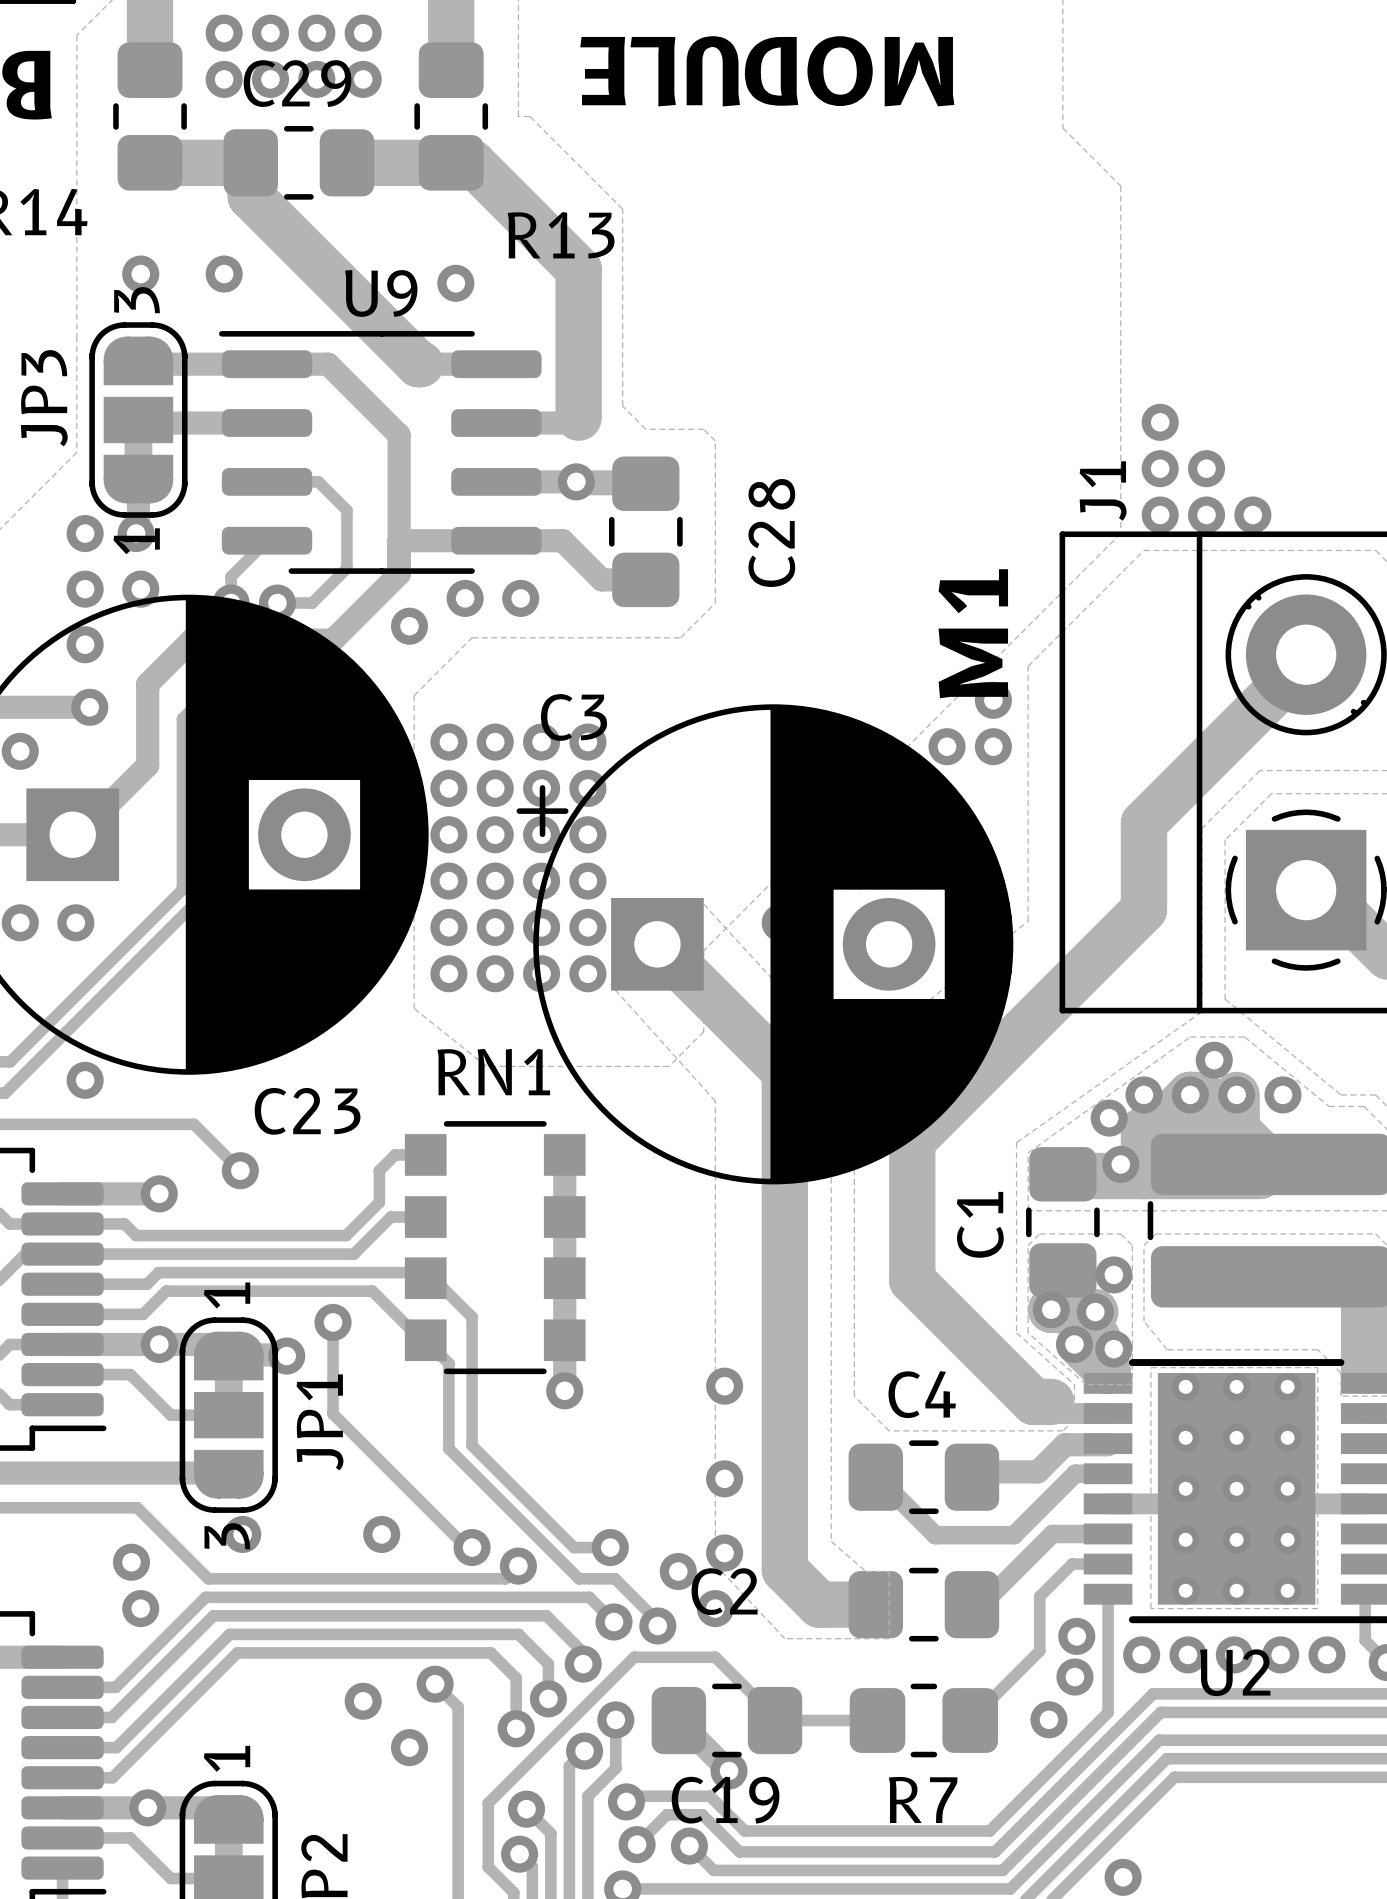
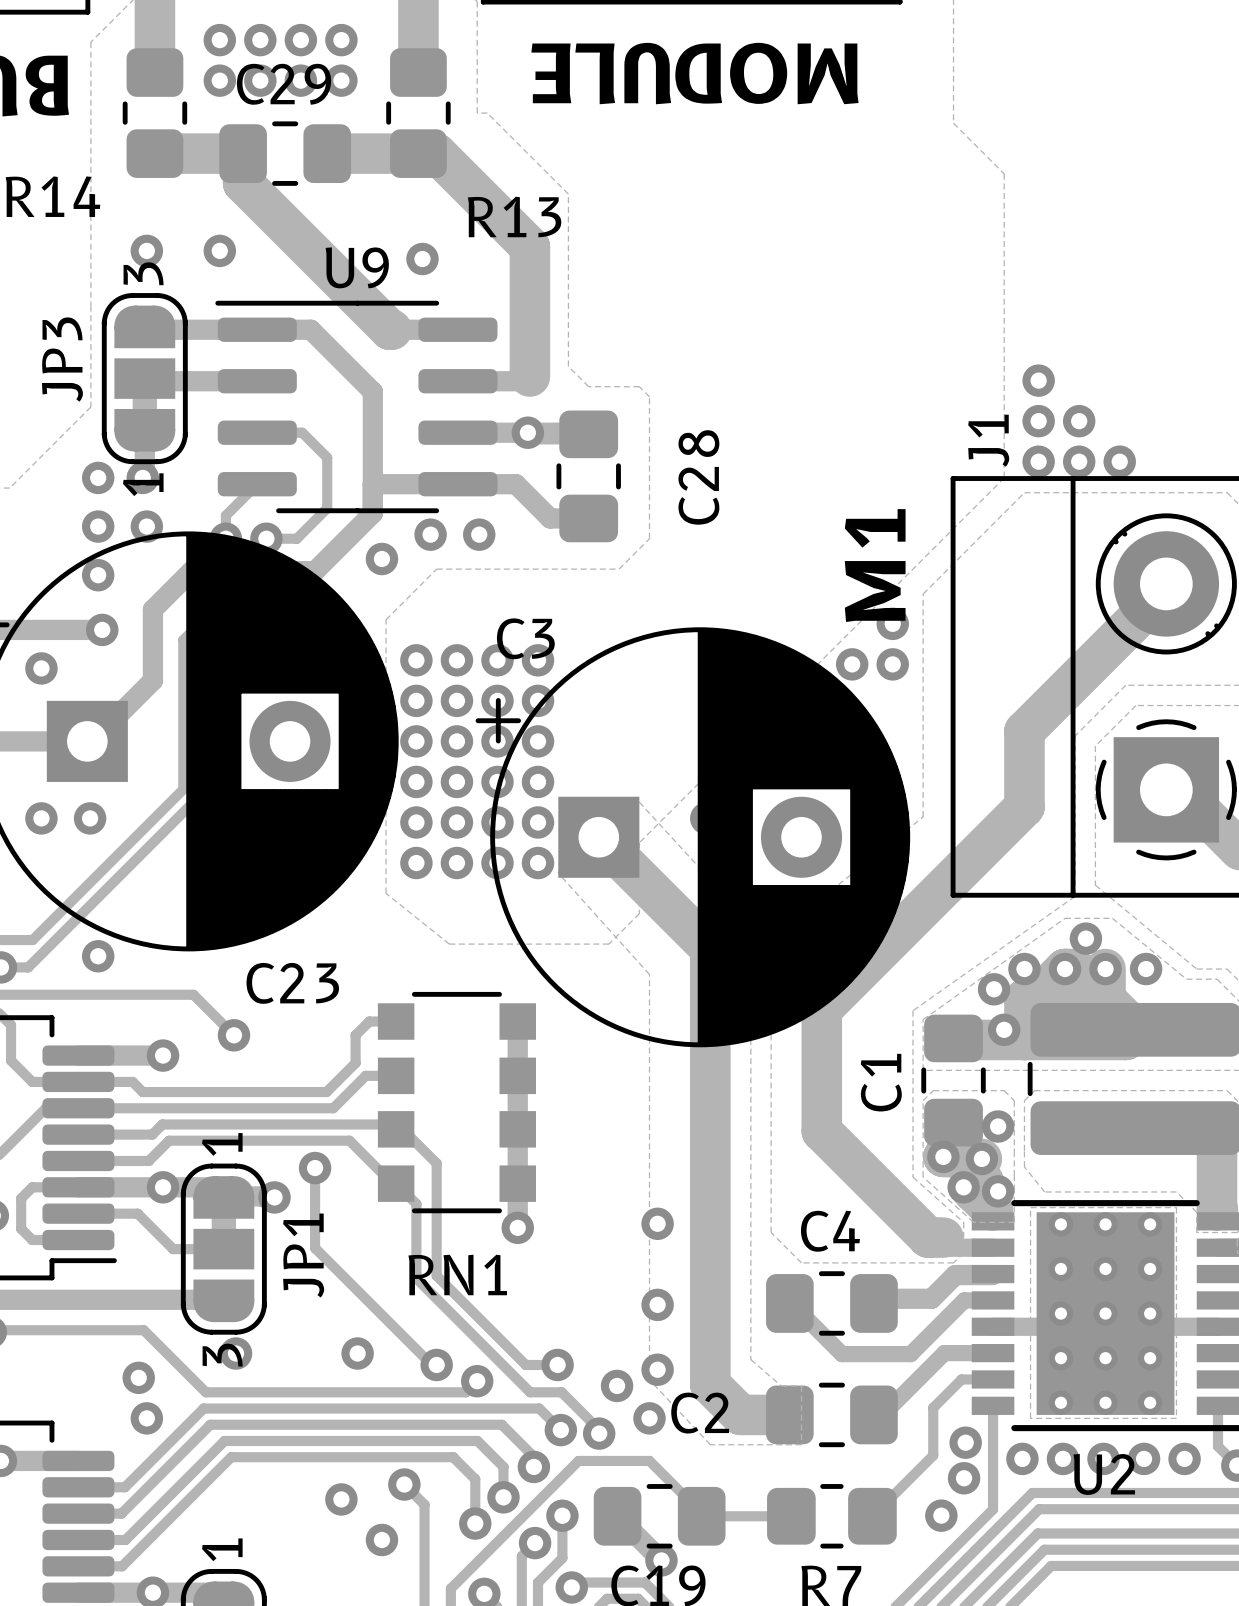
RN1 name position: RN1 (493, 1072) -> RN1 (457, 1274)
C2 name position: C2 (724, 1591) -> C2 (700, 1413)

